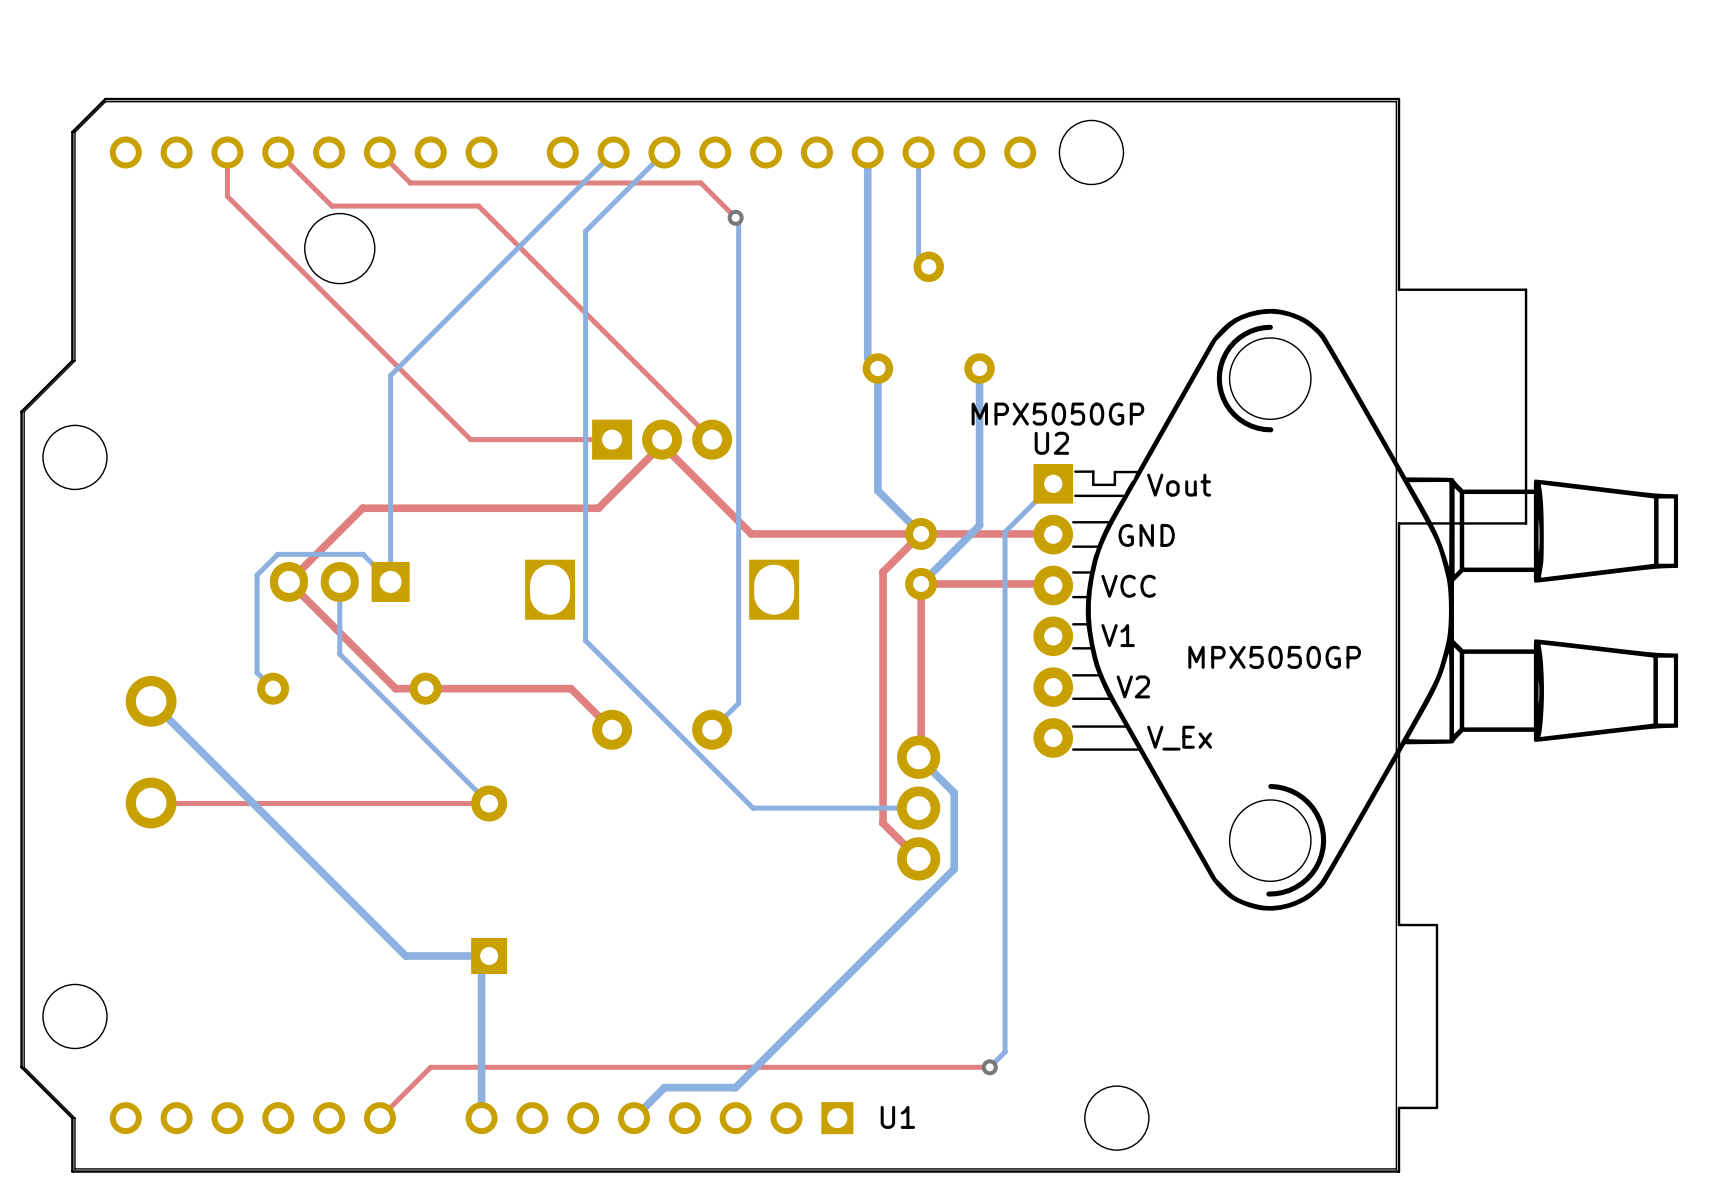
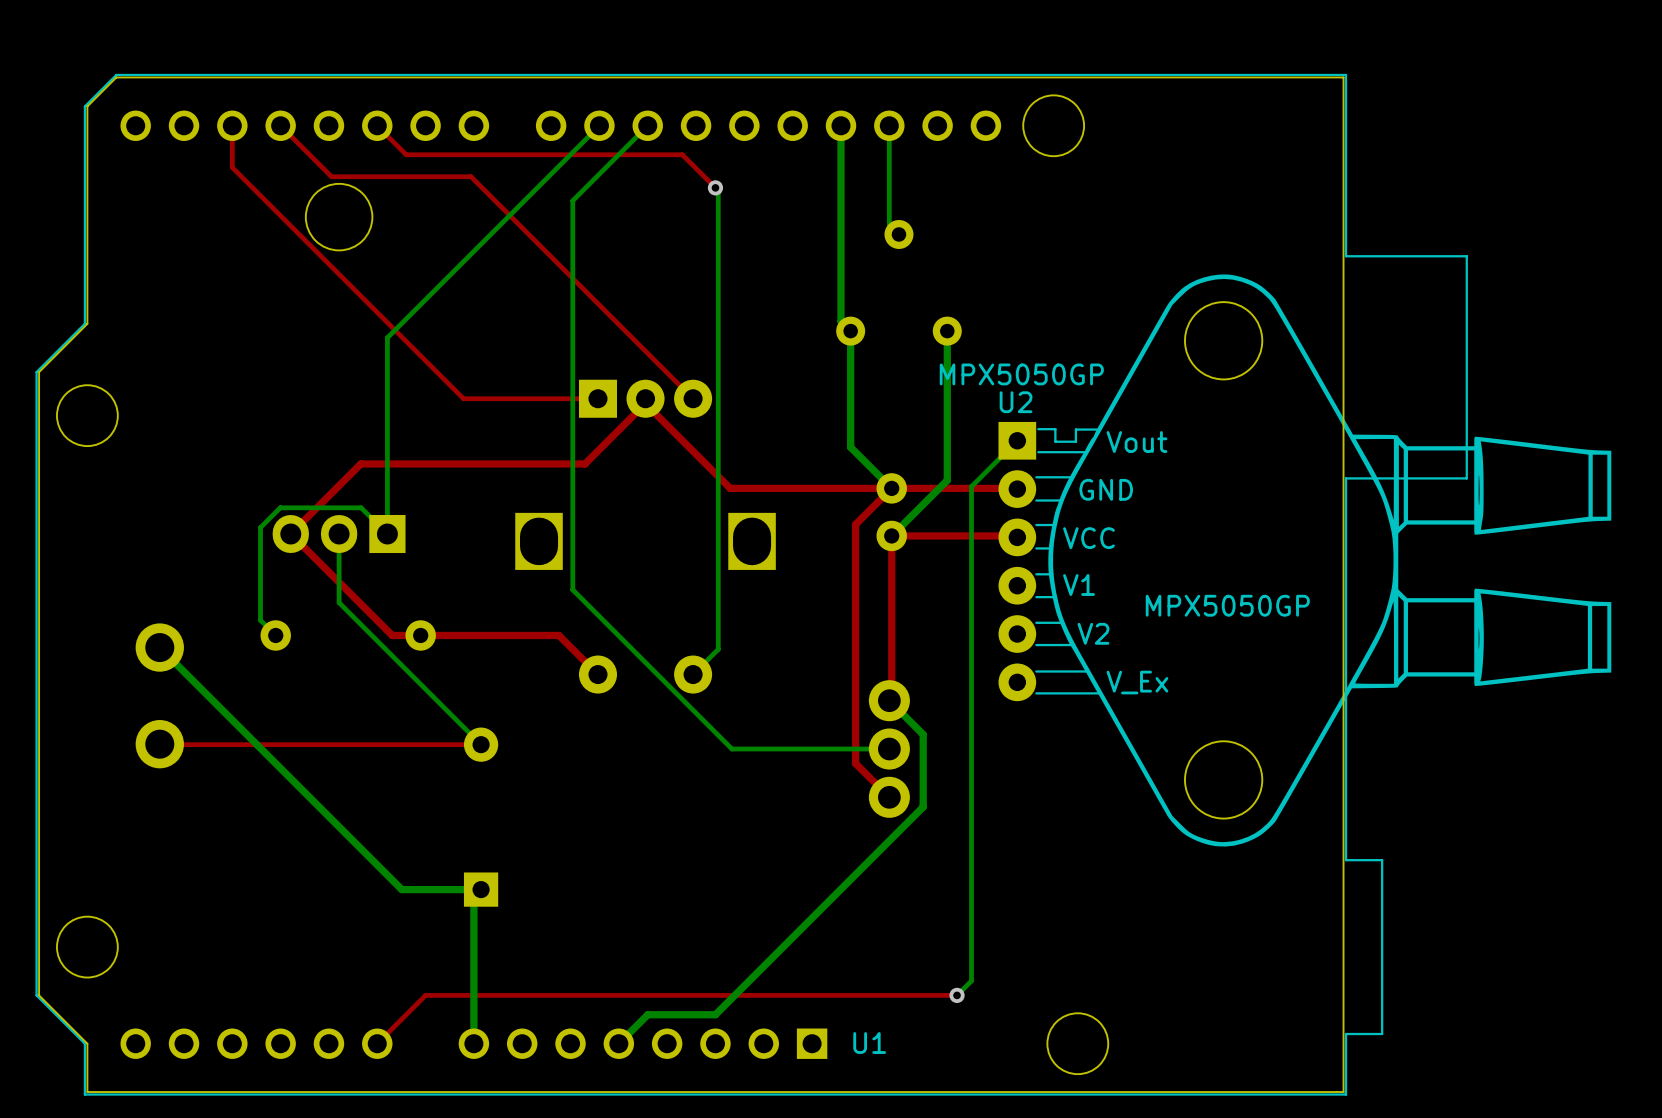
U2 footprint: [1033, 308, 1679, 911] -> [998, 274, 1612, 847]

